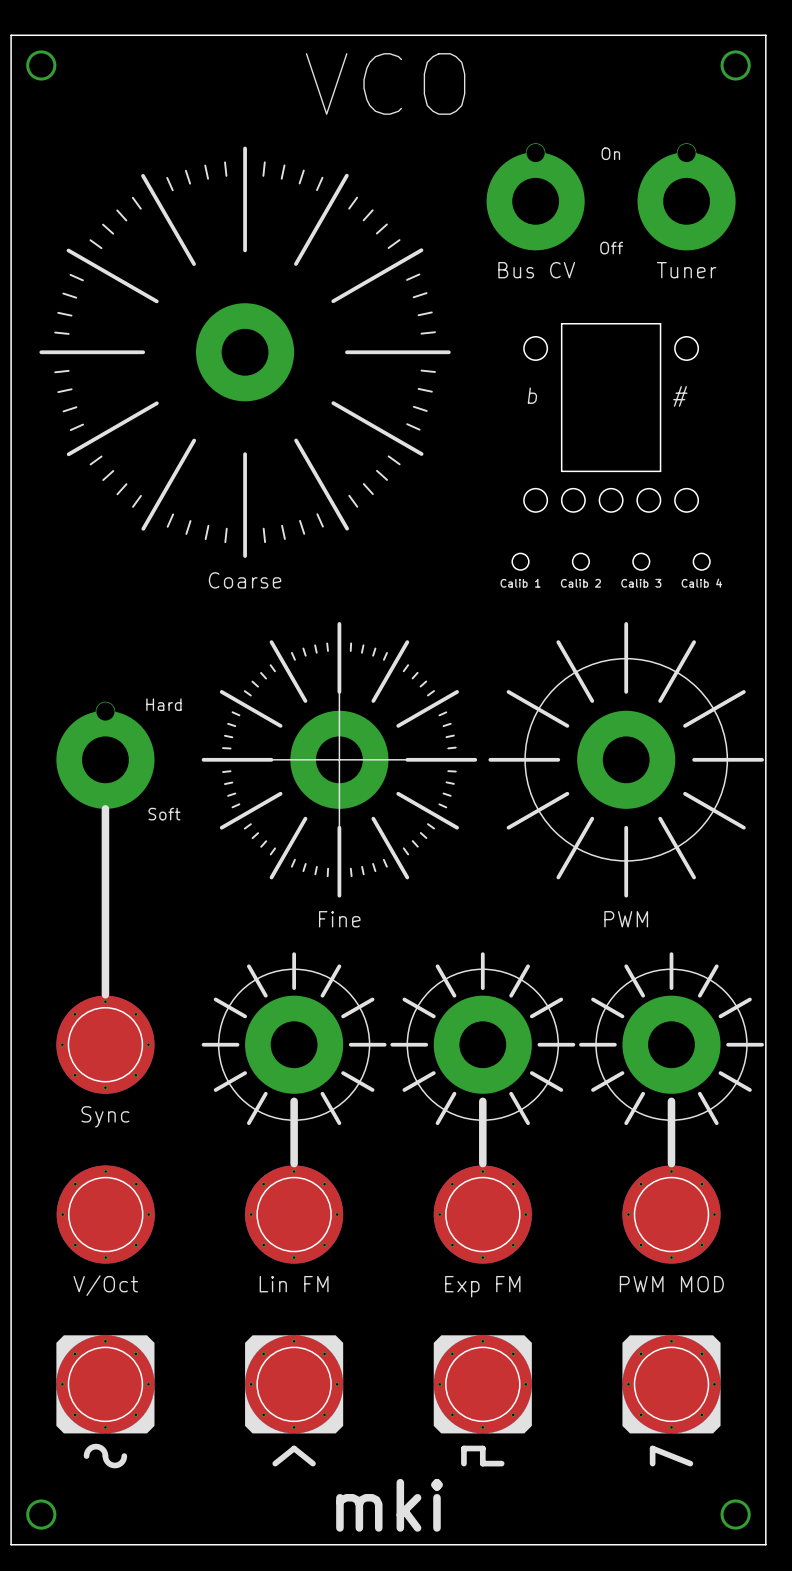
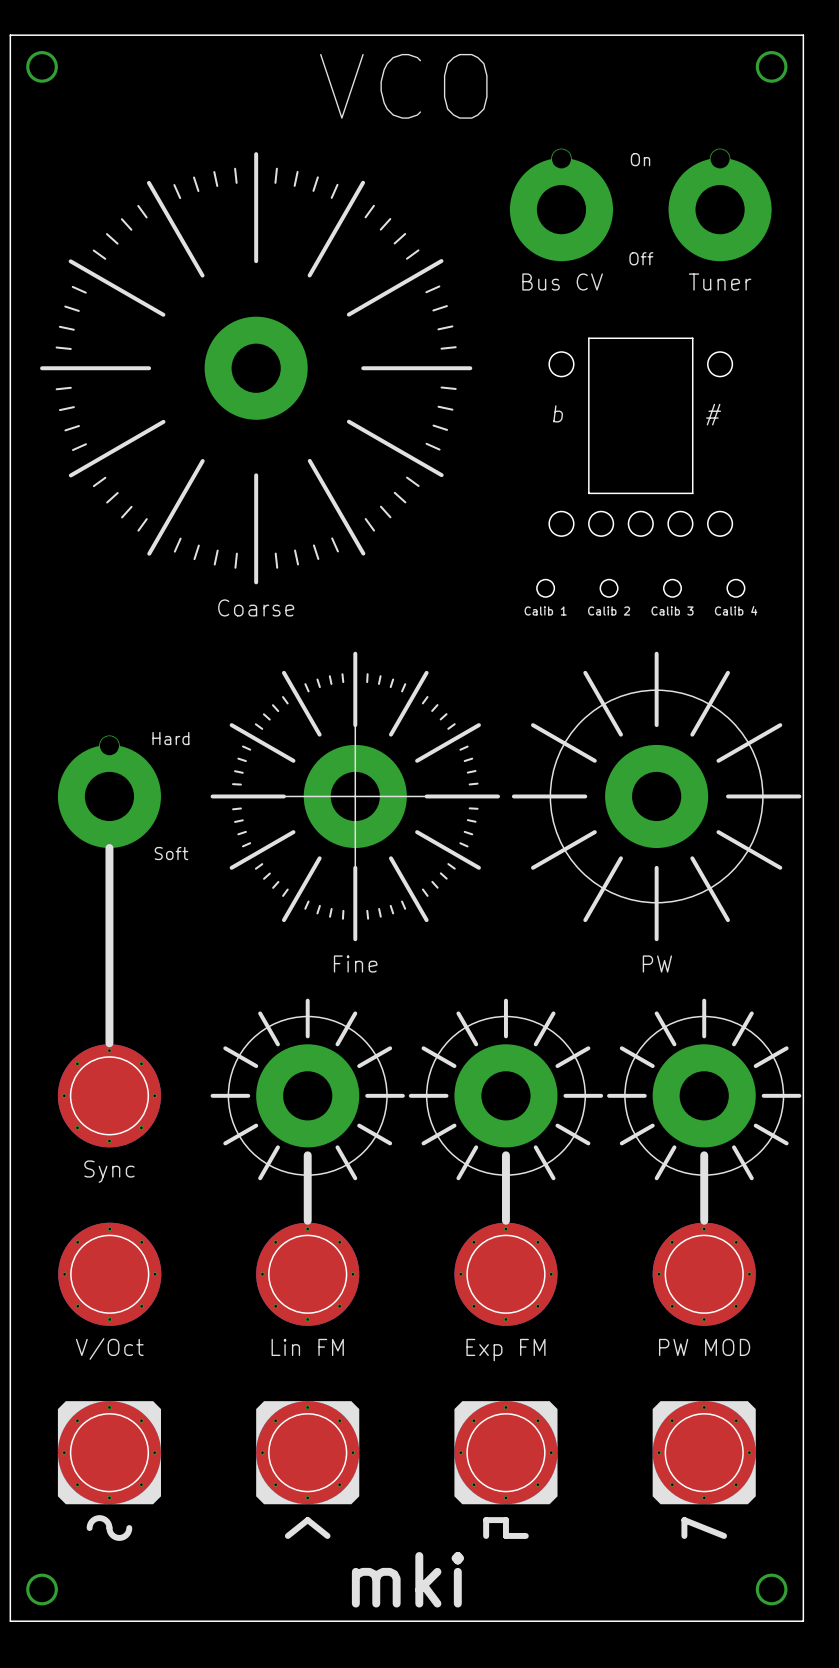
part value: PWM (626, 919) -> PW (657, 963)
part value: PWM MOD (671, 1284) -> PW MOD (704, 1347)

